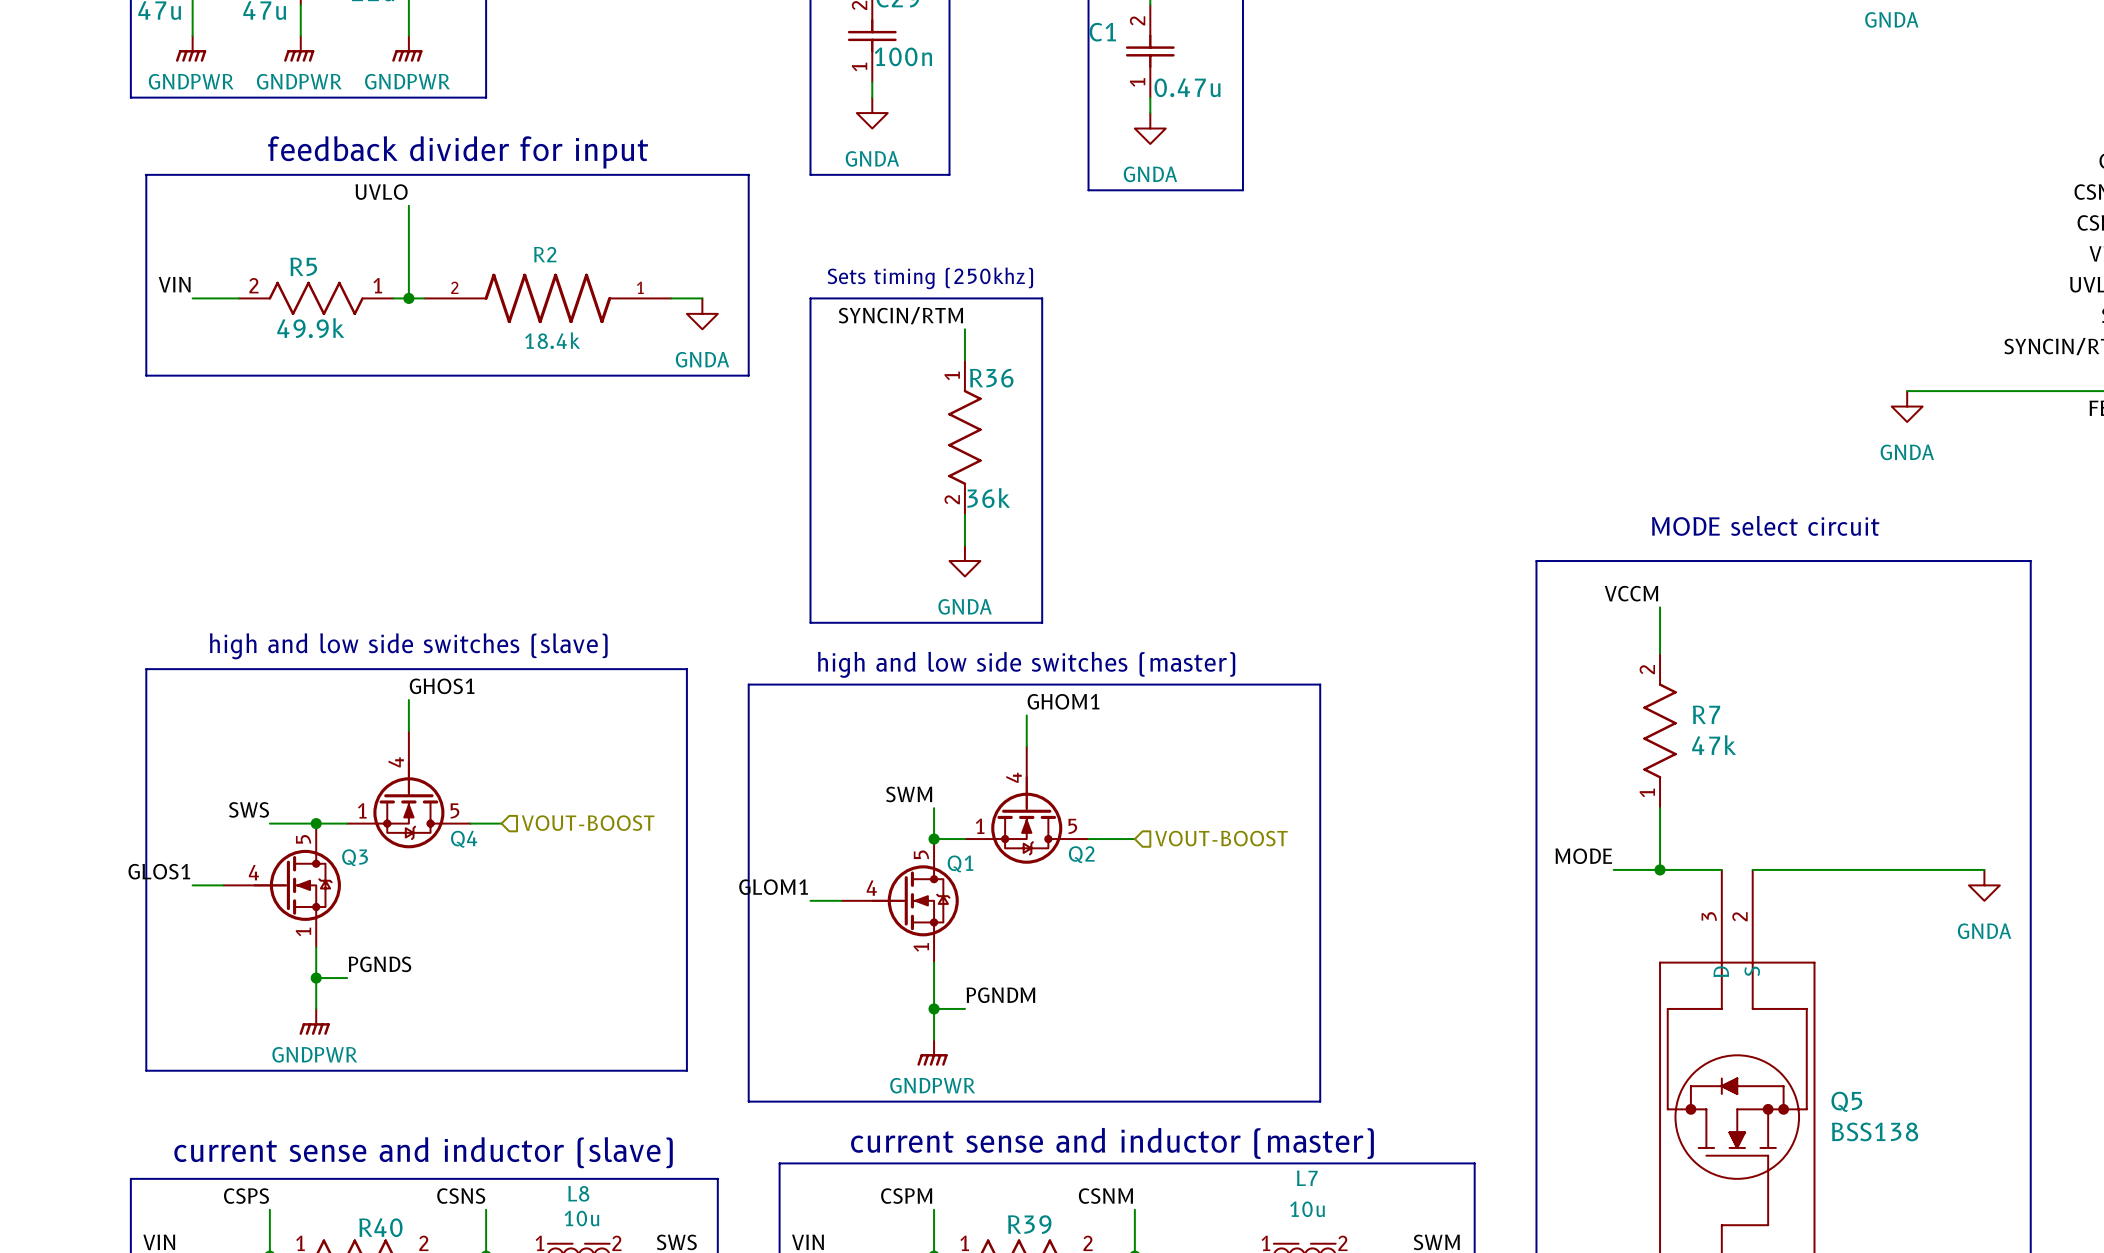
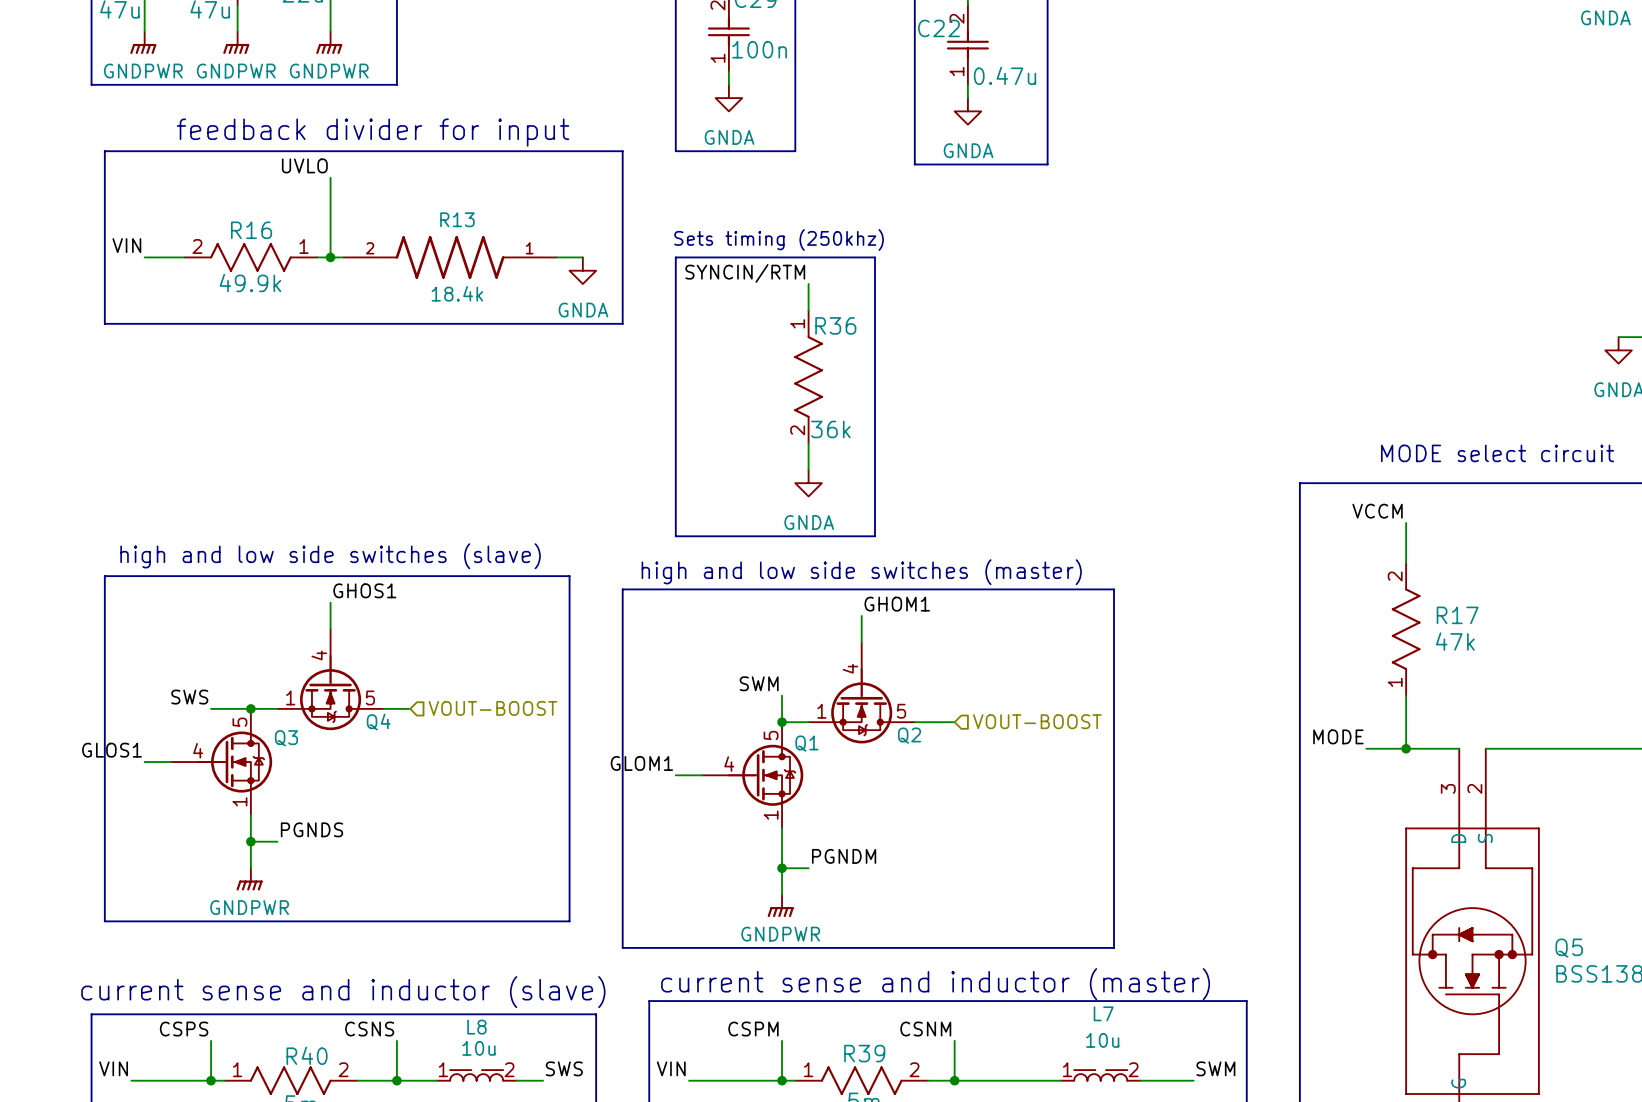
C1 name: C1 (1102, 32) -> C22 (939, 28)
R2 name: R2 (545, 254) -> R13 (457, 219)
R5 name: R5 (303, 266) -> R16 (251, 230)
R7 name: R7 (1706, 714) -> R17 (1457, 615)

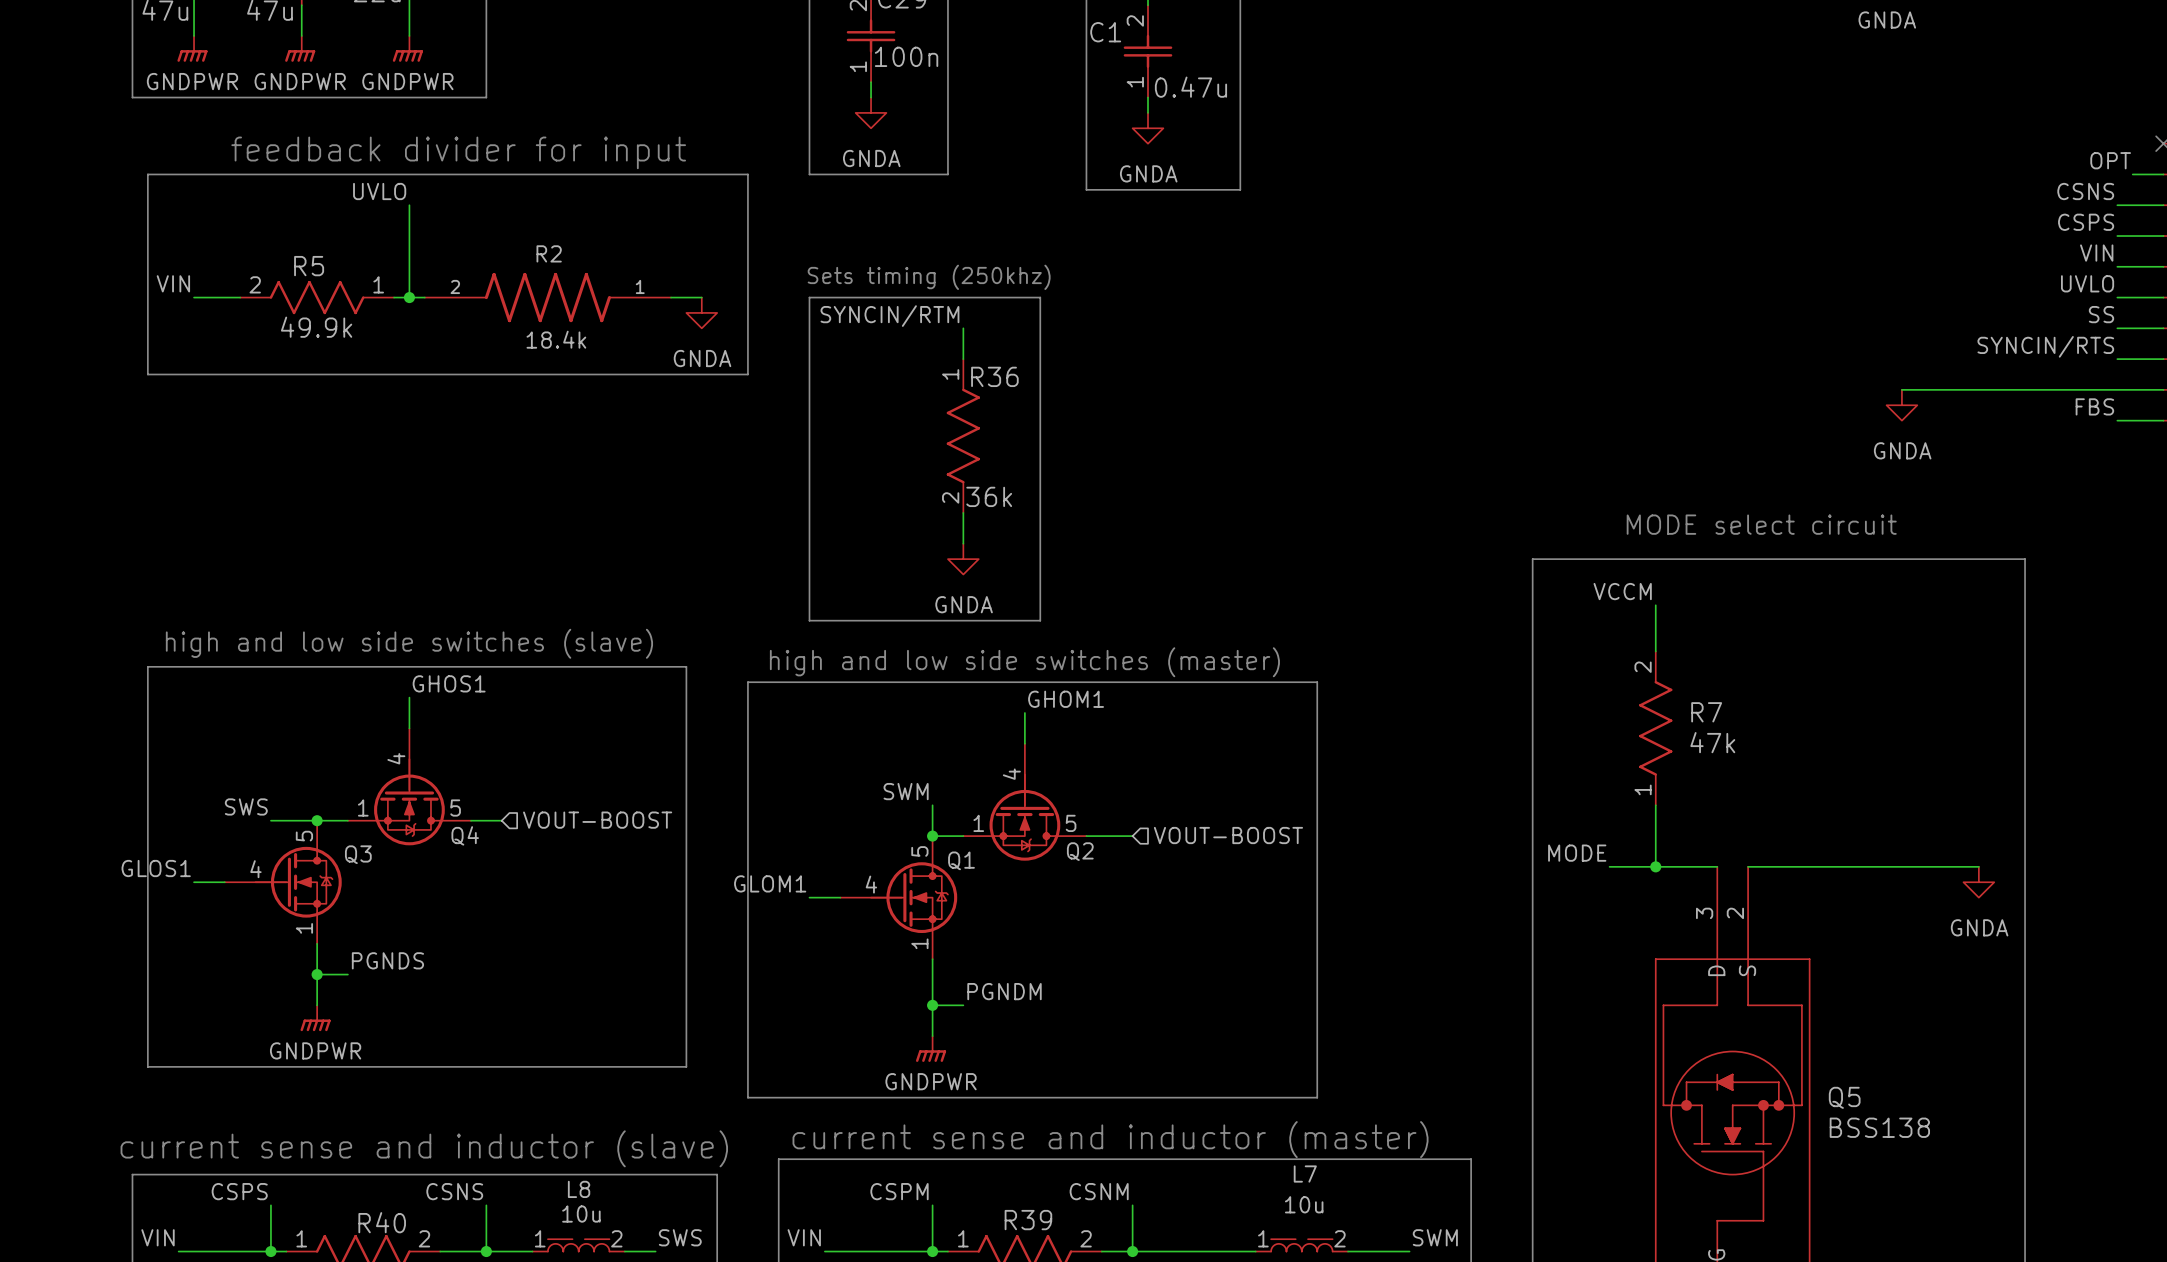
C22 name: C22 (939, 28) -> C1 (1105, 32)
R13 name: R13 (457, 219) -> R2 (549, 253)
R16 name: R16 (251, 230) -> R5 (309, 266)
R17 name: R17 (1457, 615) -> R7 (1706, 712)

